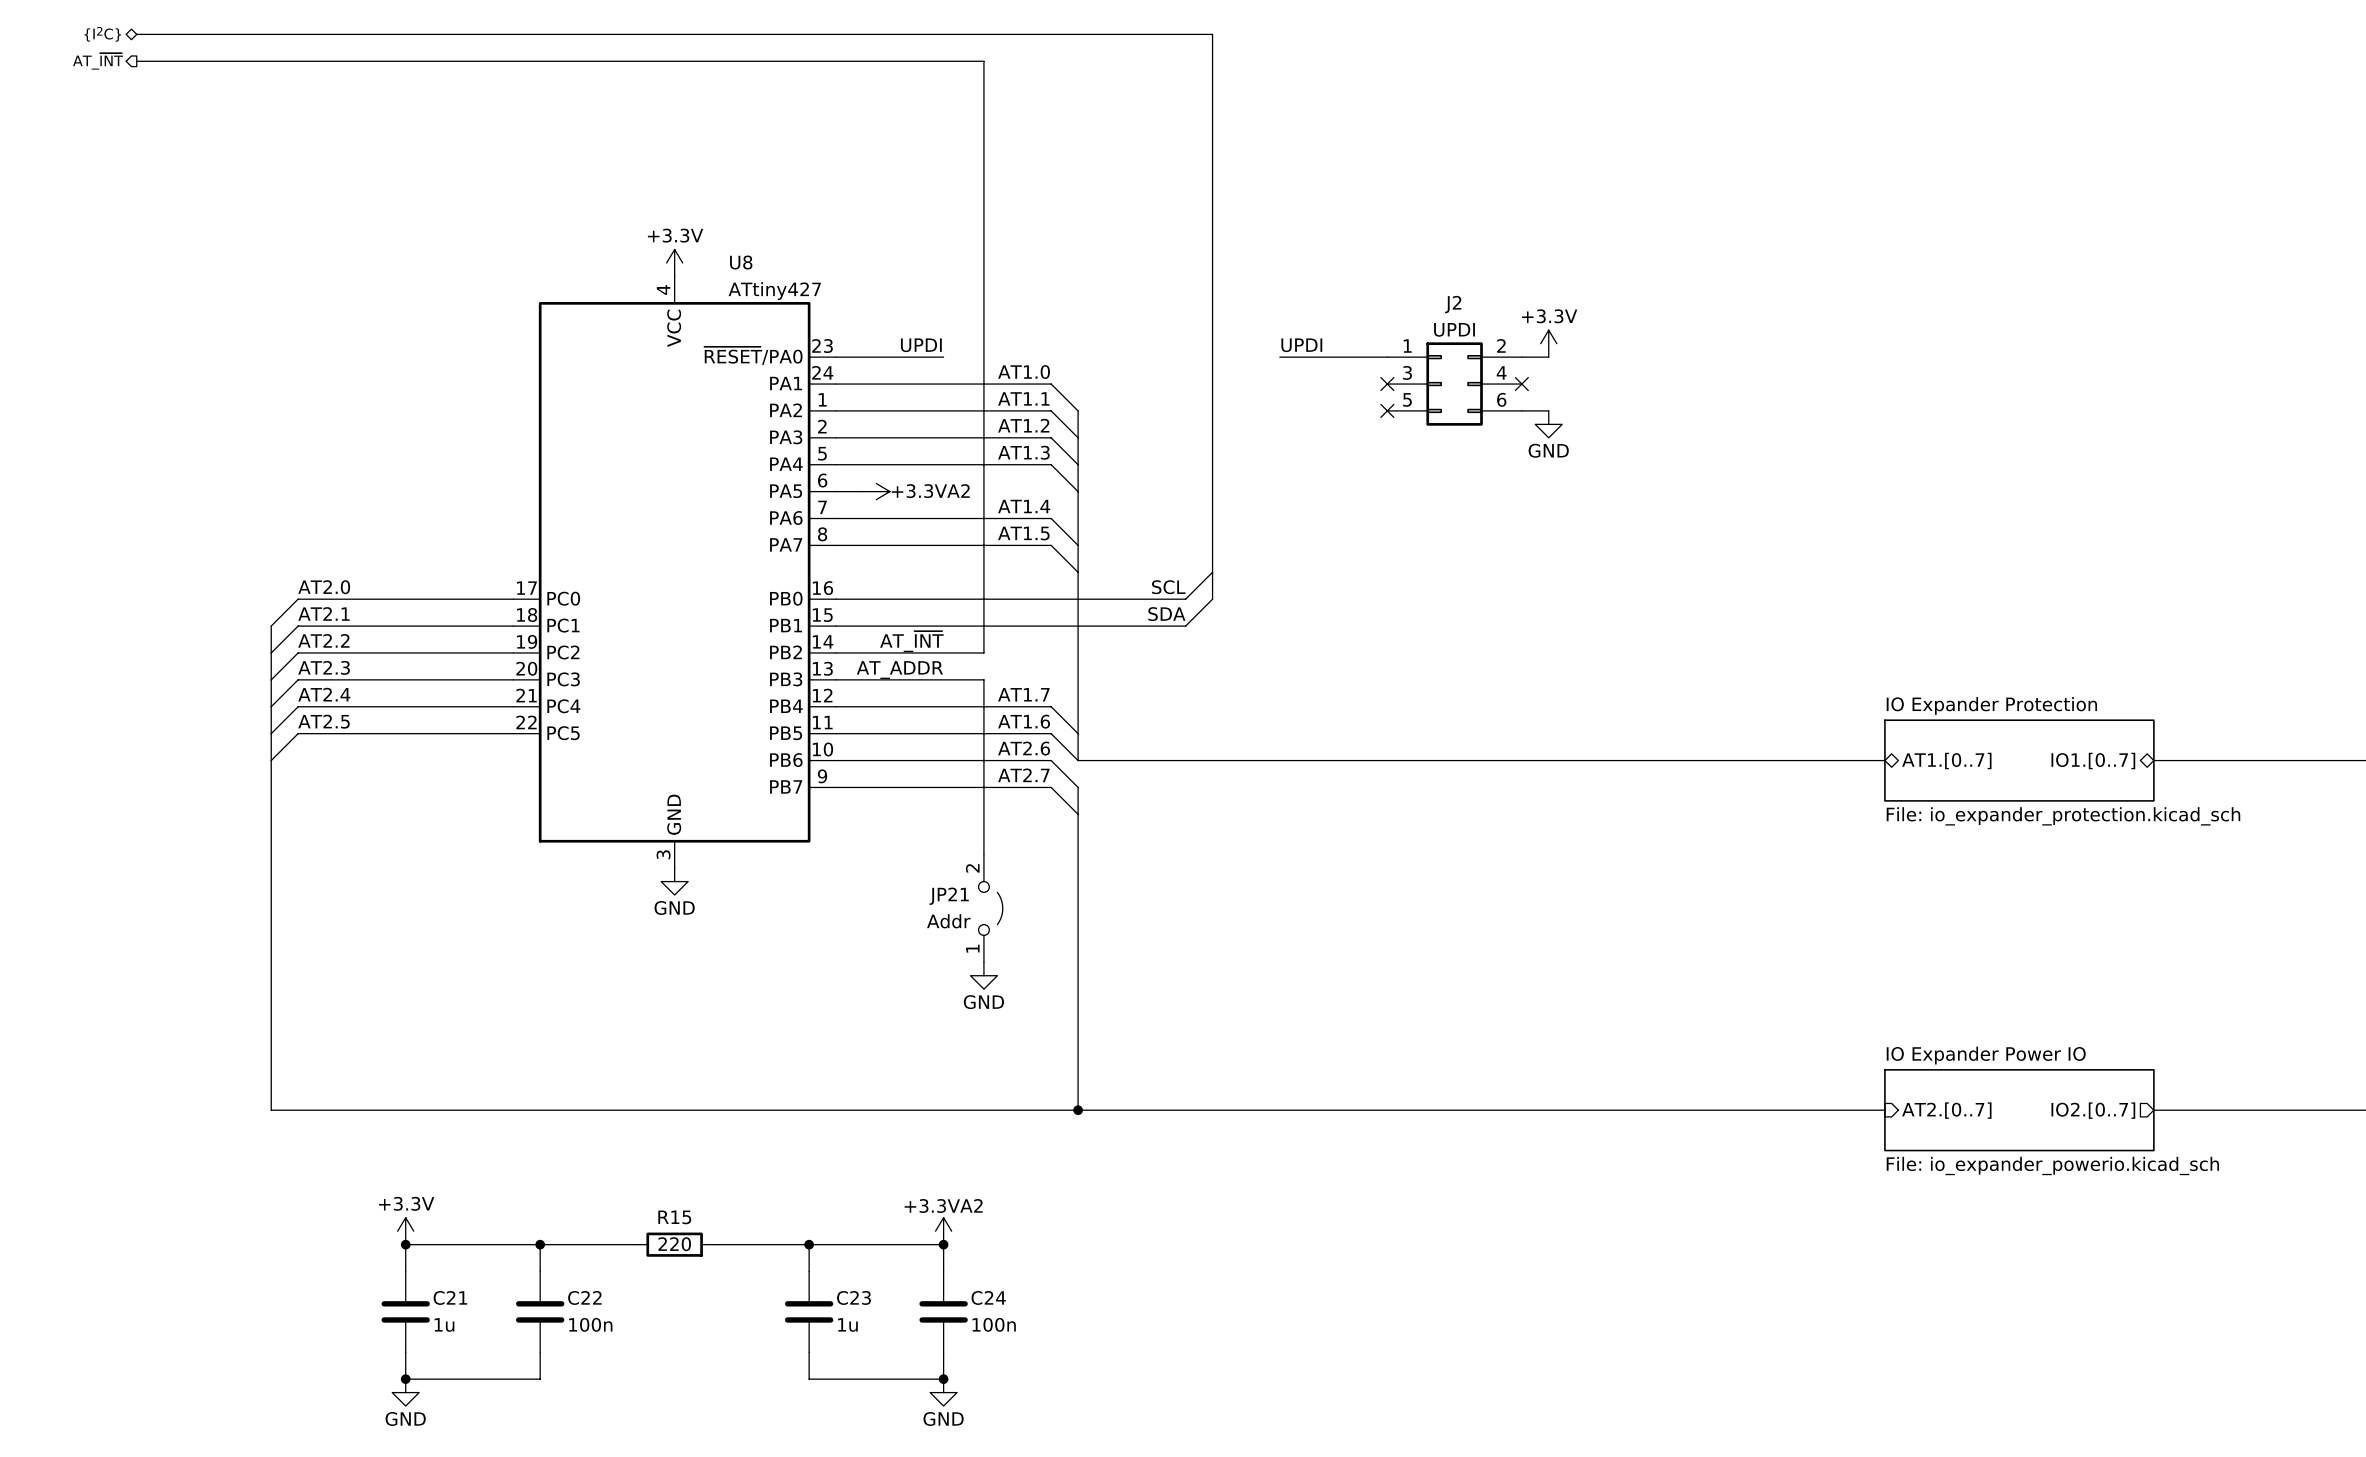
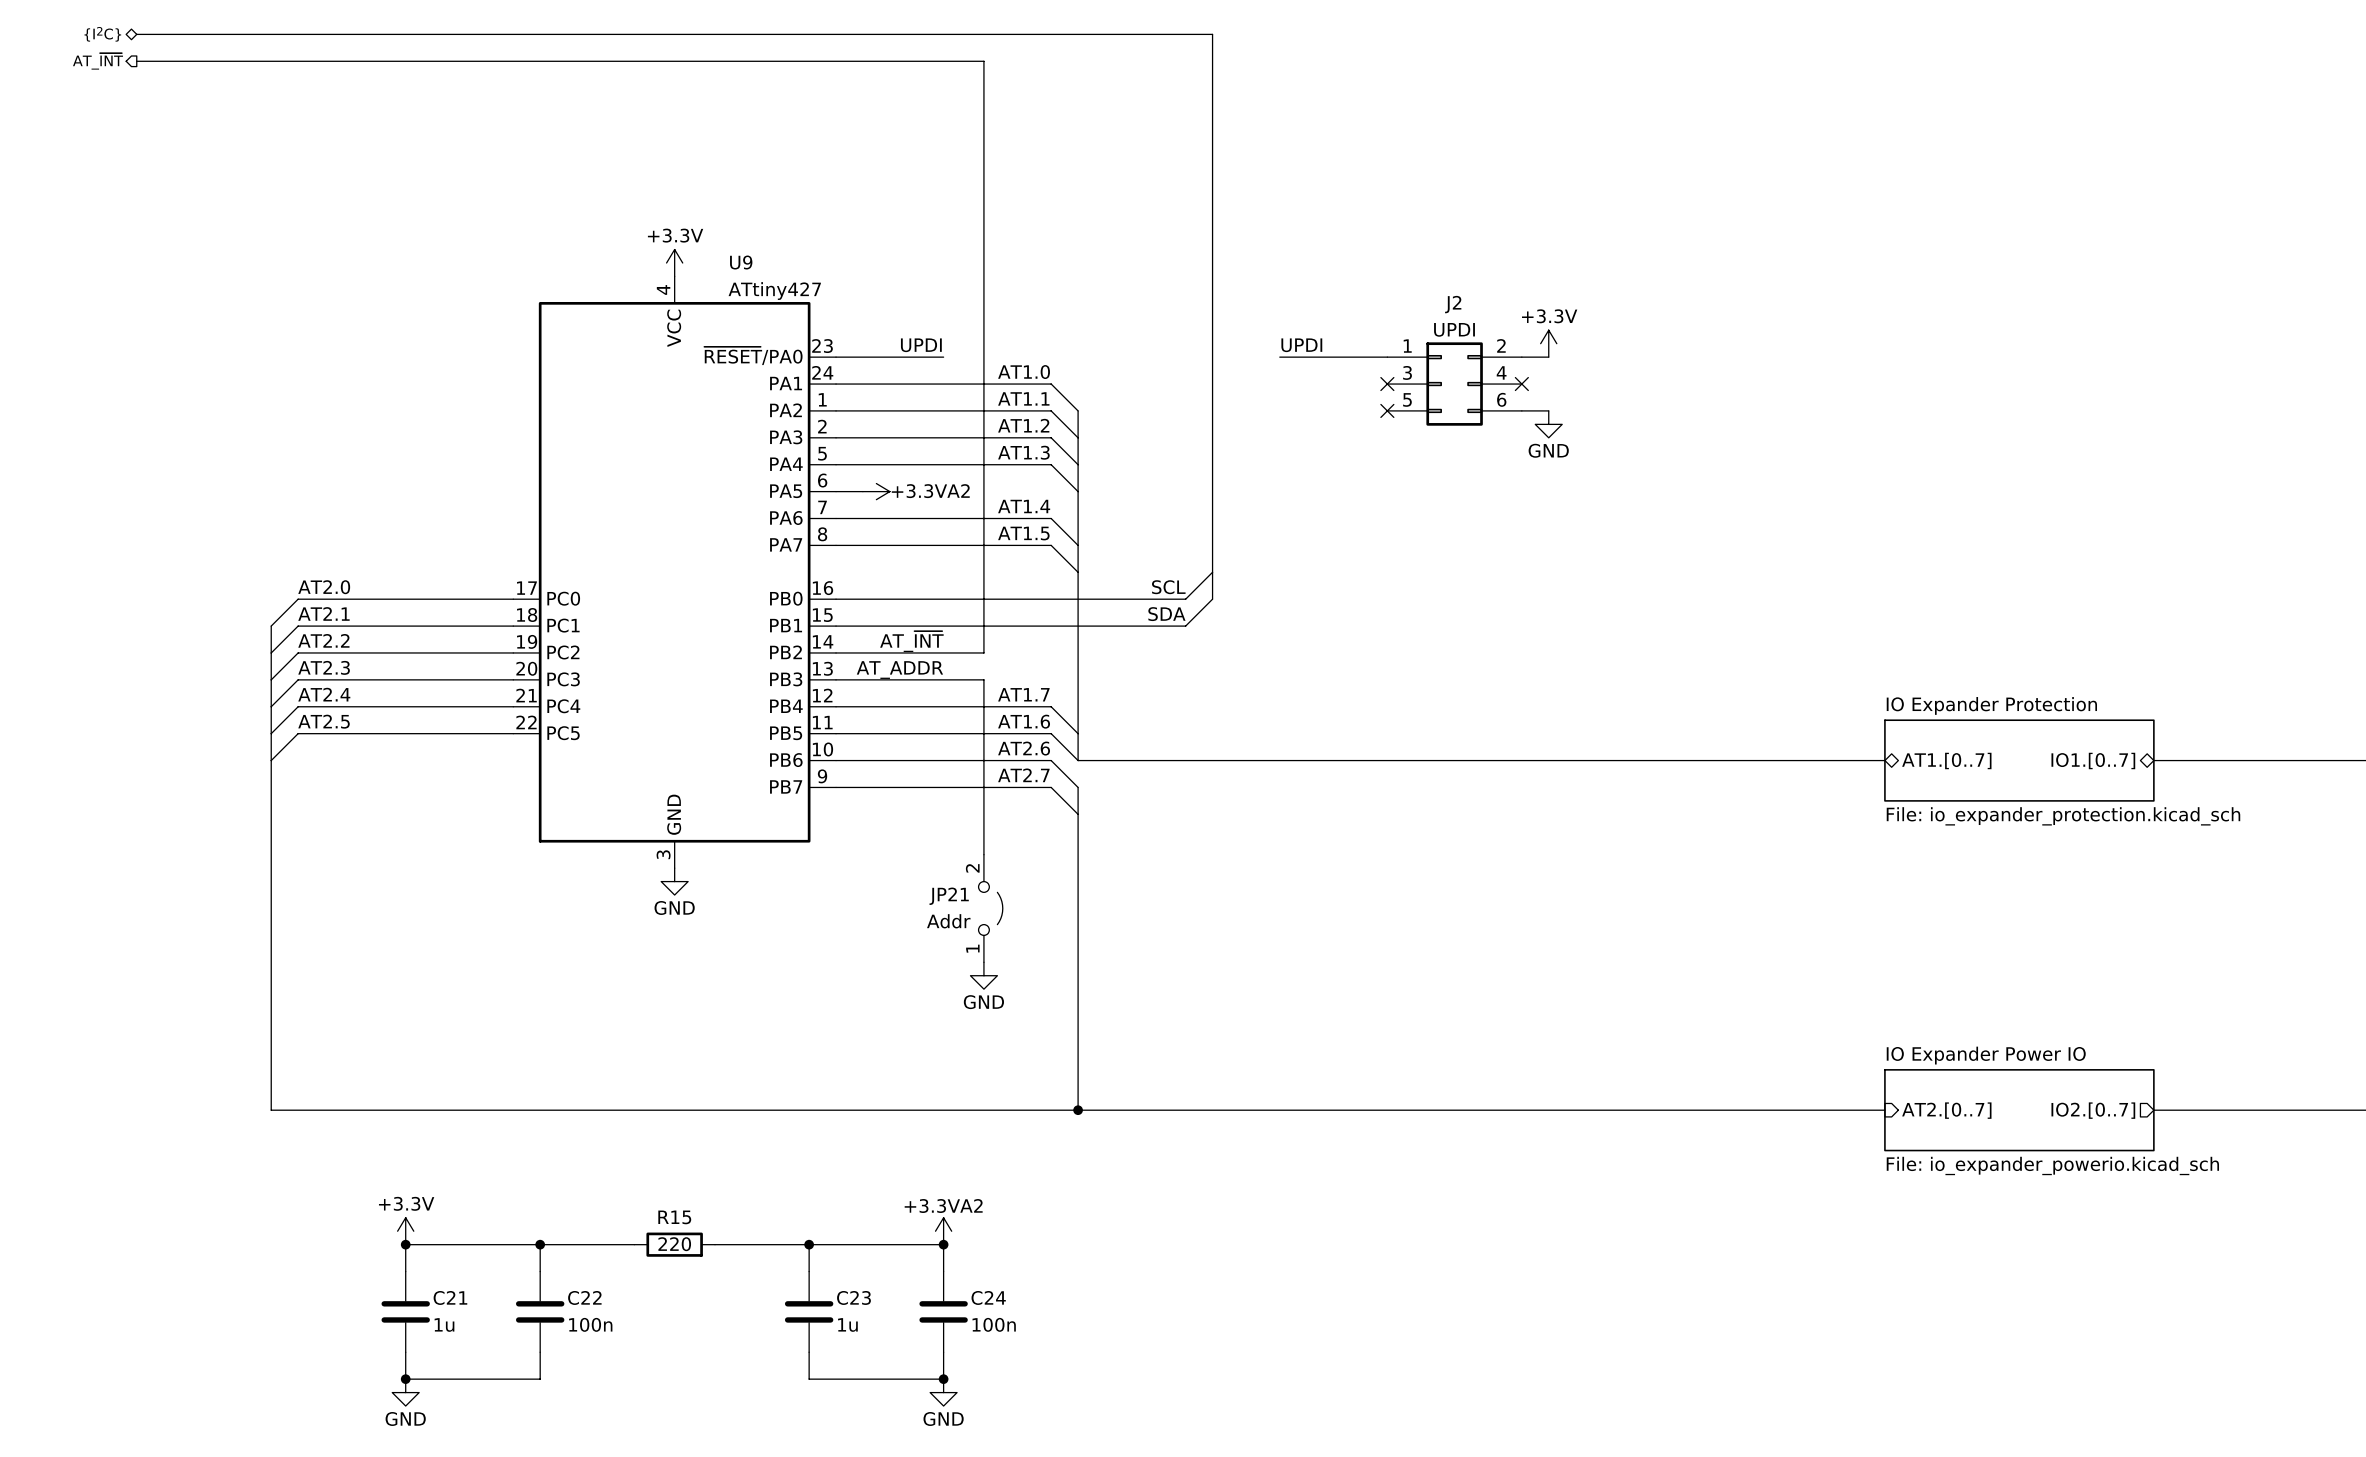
U8 name: U8 (741, 262) -> U9 (741, 262)

